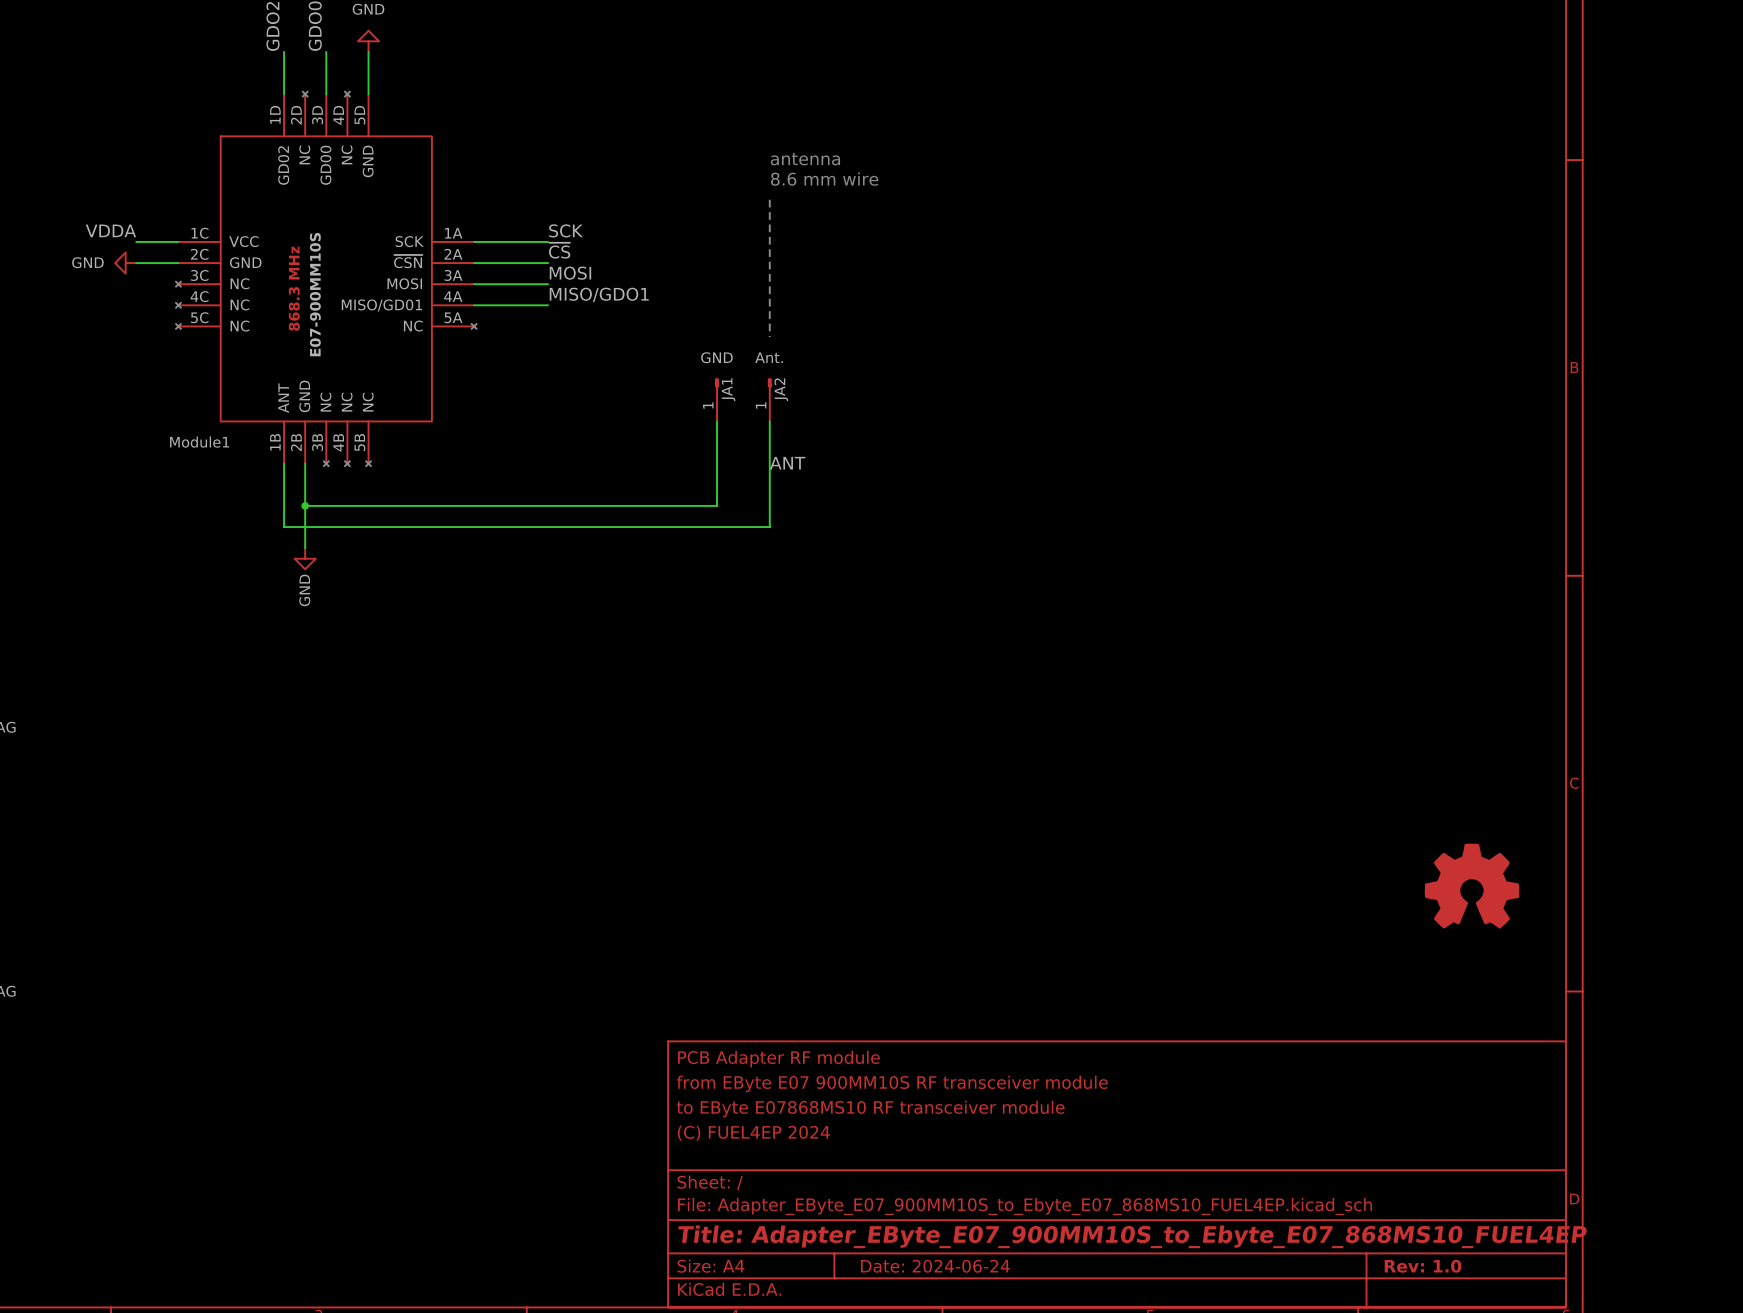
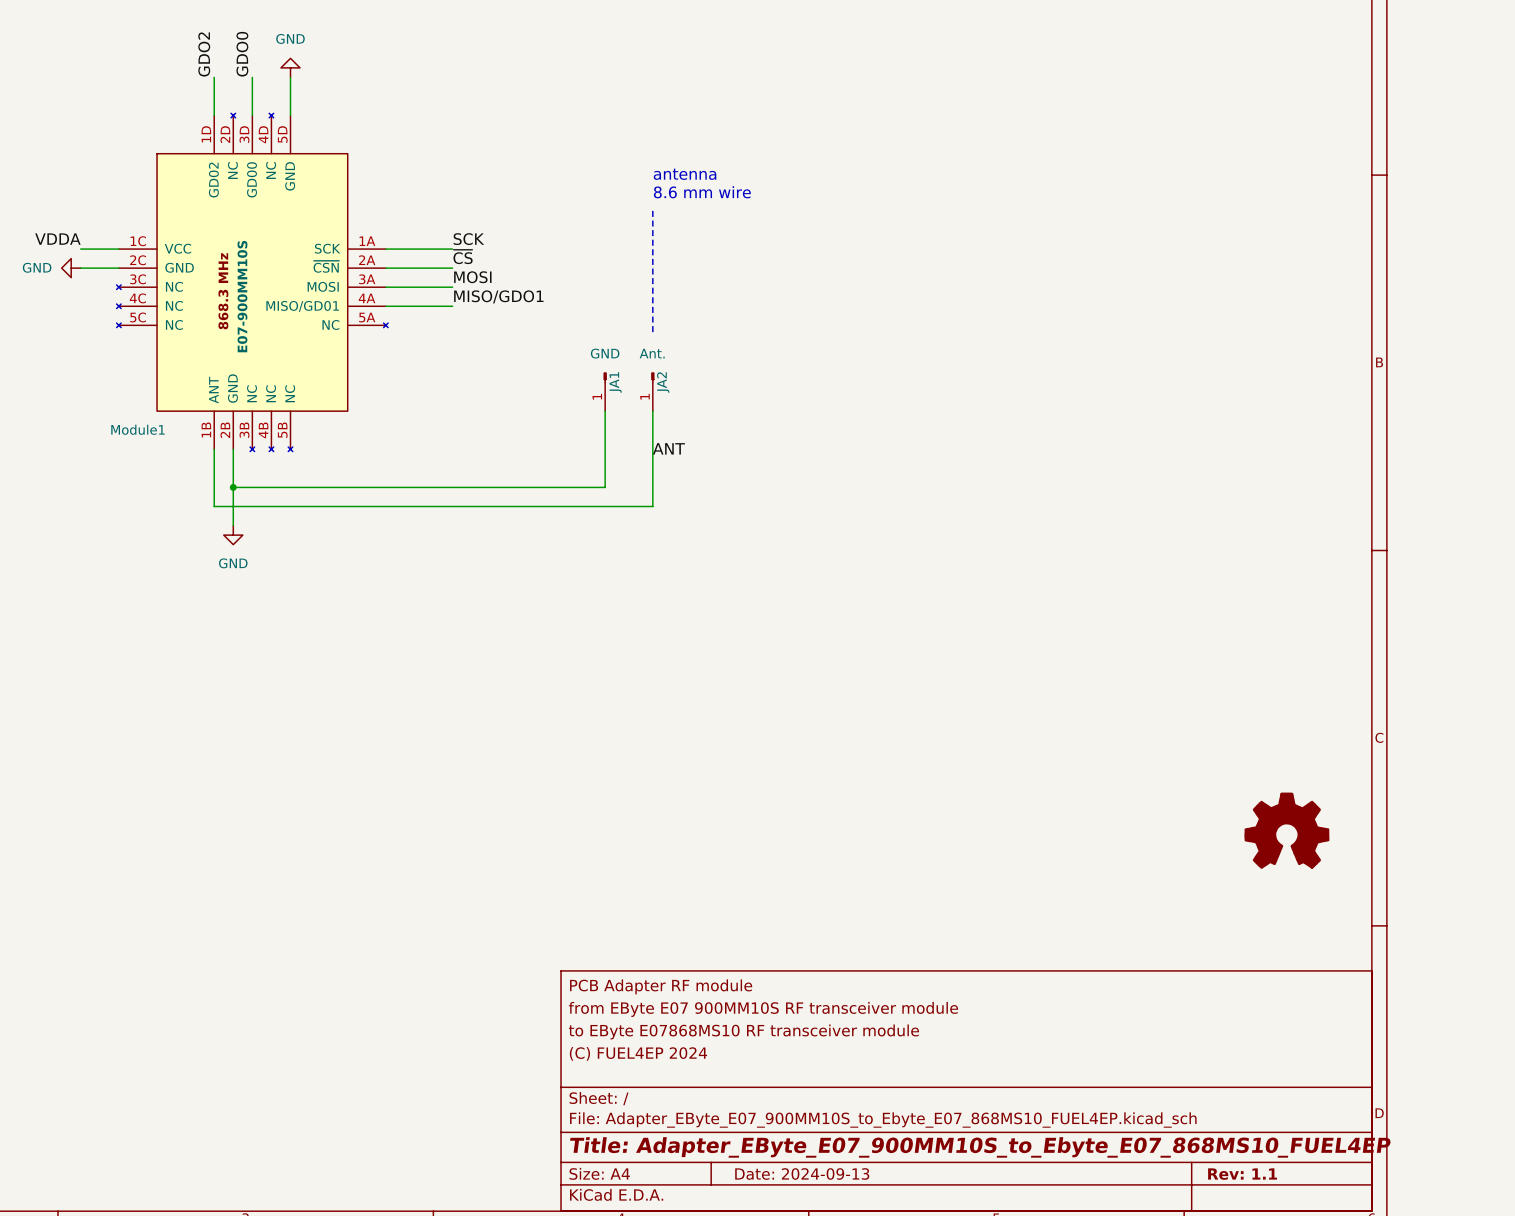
power symbol text rotation: 0° (304, 590) -> 90° clockwise (233, 563)
title block: Date: 2024-06-24 (935, 1266) -> Date: 2024-09-13 (802, 1173)
title block: Rev: 1.0 (1423, 1266) -> Rev: 1.1 (1242, 1174)

